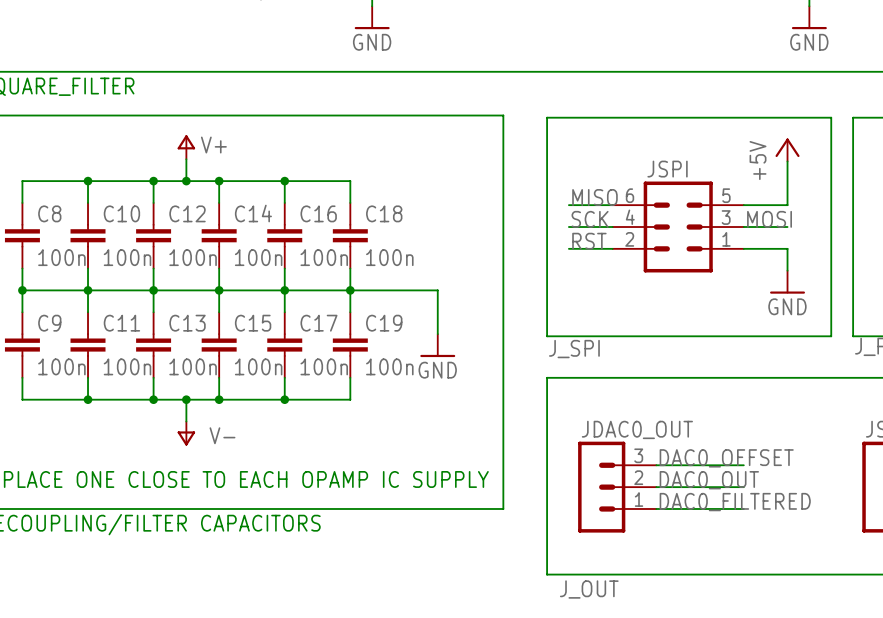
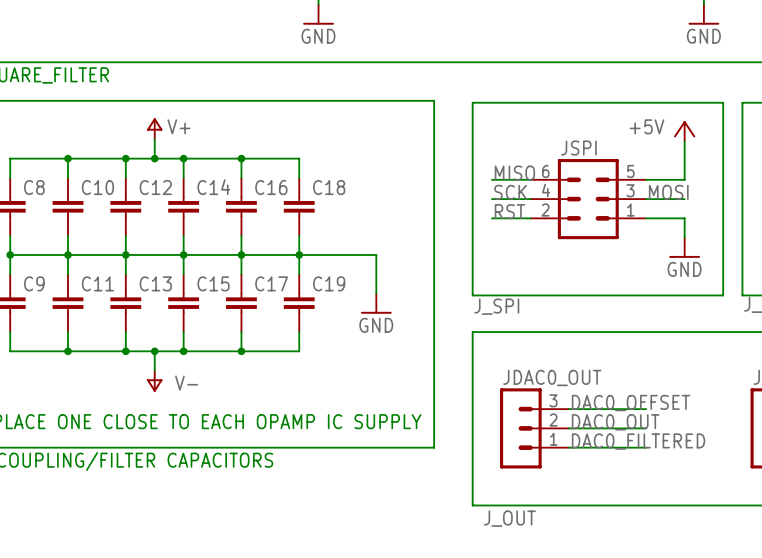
power symbol text rotation: 0° (758, 160) -> 90° clockwise (647, 126)
C8 value: 100n (61, 257) -> none
C10 value: 100n (127, 257) -> none
C12 value: 100n (193, 257) -> none
C14 value: 100n (258, 257) -> none
C16 value: 100n (324, 257) -> none
C18 value: 100n (389, 257) -> none
C9 value: 100n (61, 366) -> none
C11 value: 100n (127, 366) -> none
C13 value: 100n (193, 366) -> none
C15 value: 100n (258, 366) -> none
C17 value: 100n (324, 366) -> none
C19 value: 100n (389, 366) -> none

